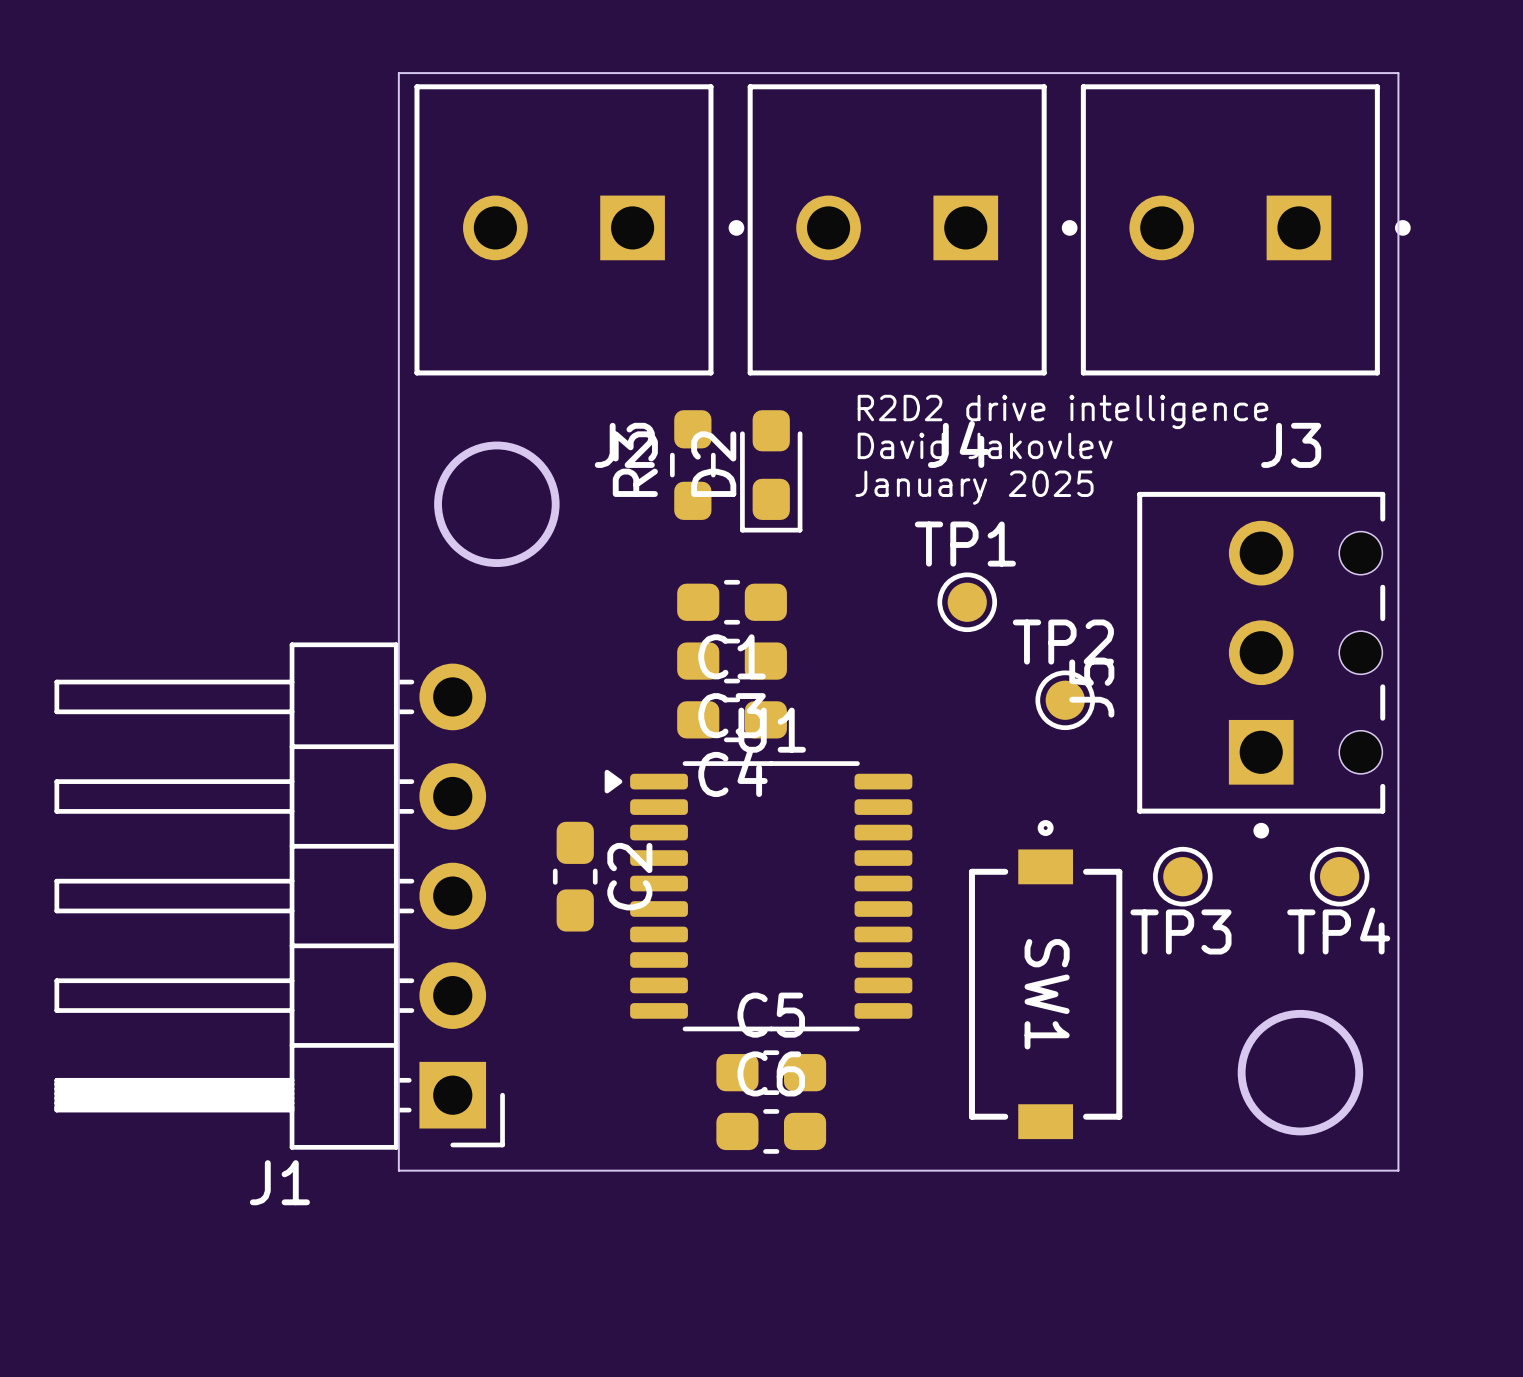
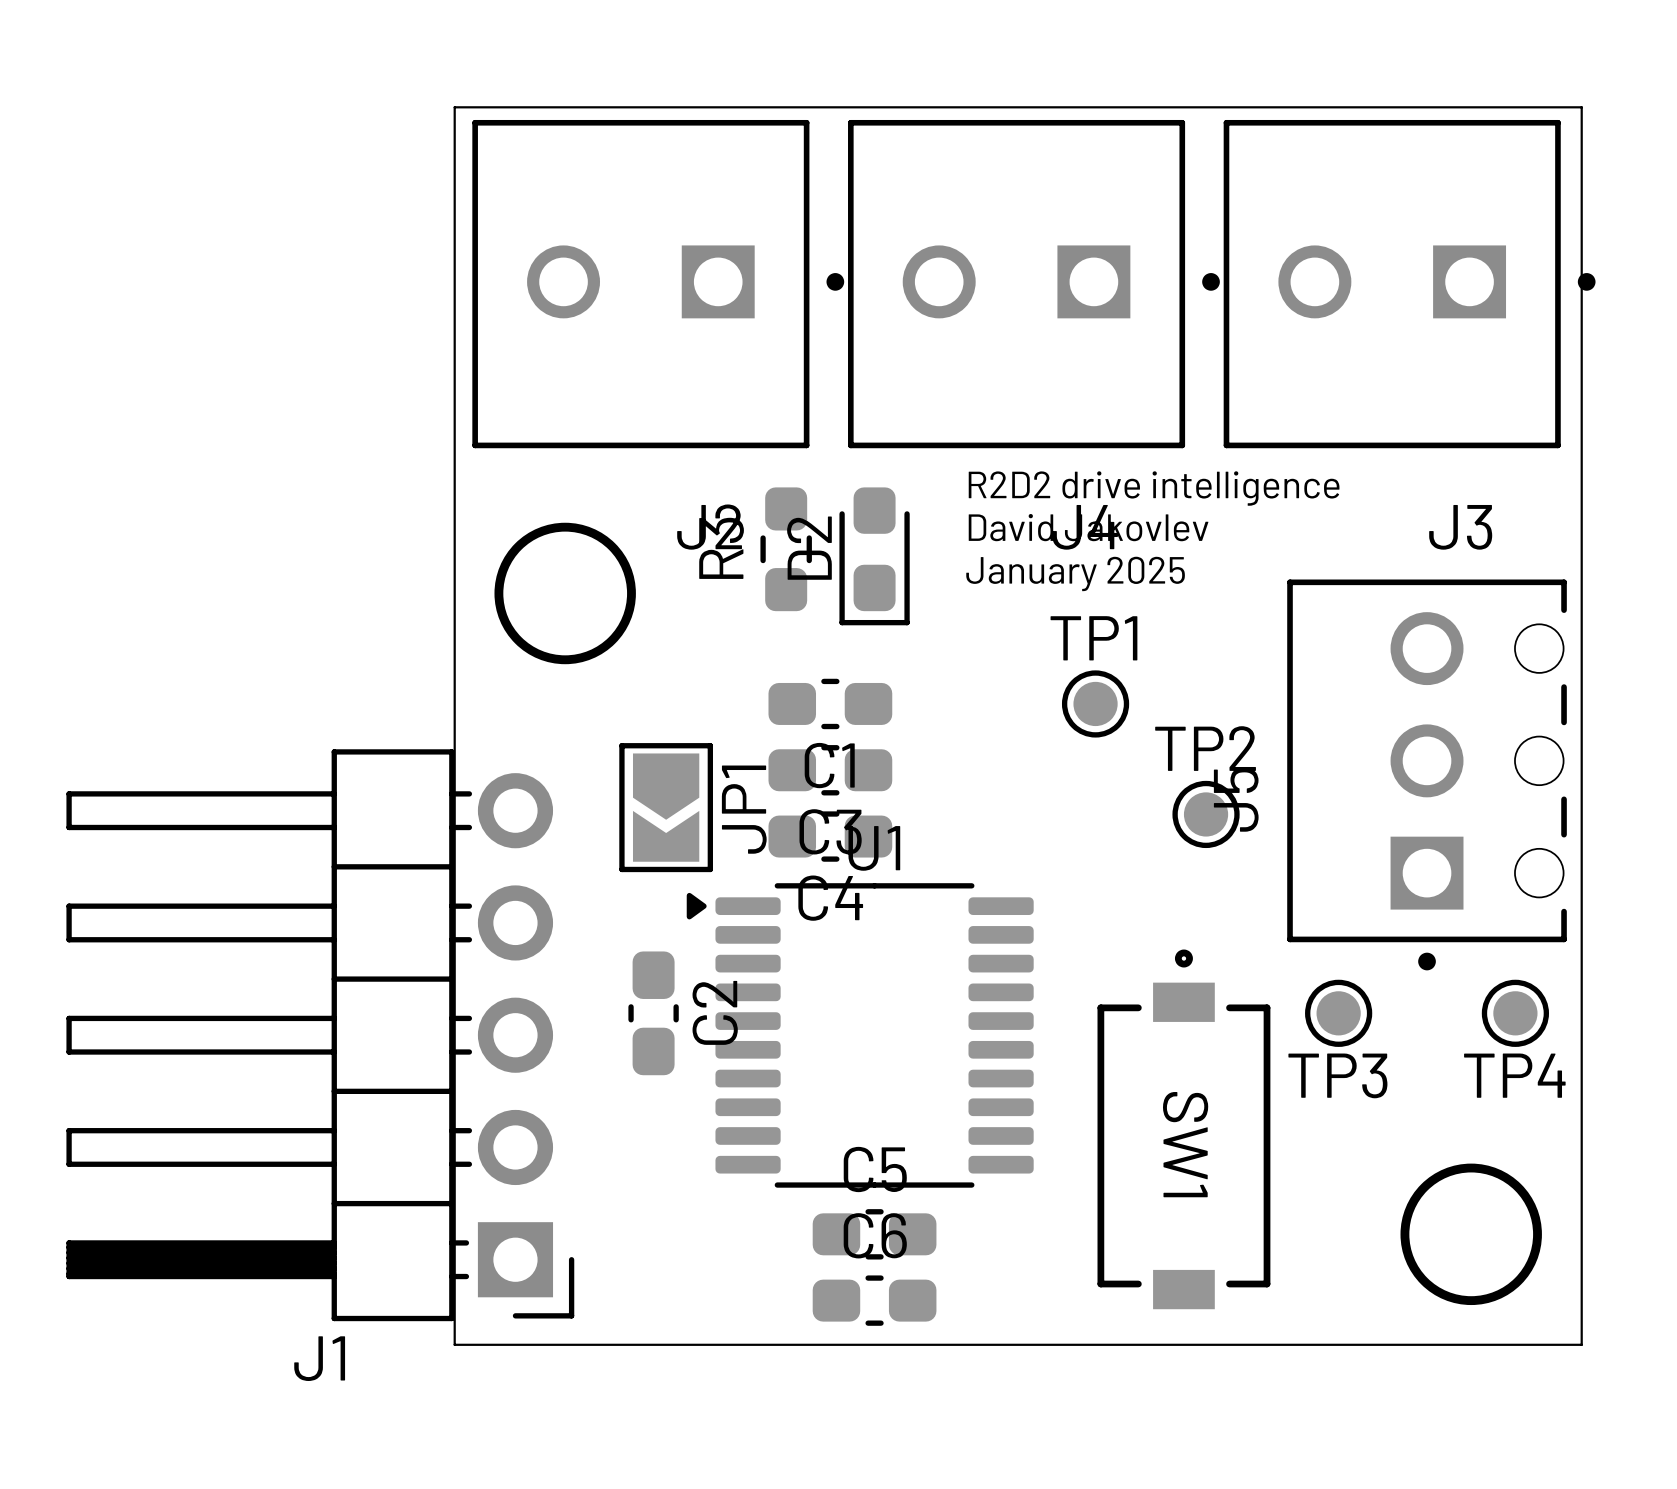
JP1: none -> (666, 807)

